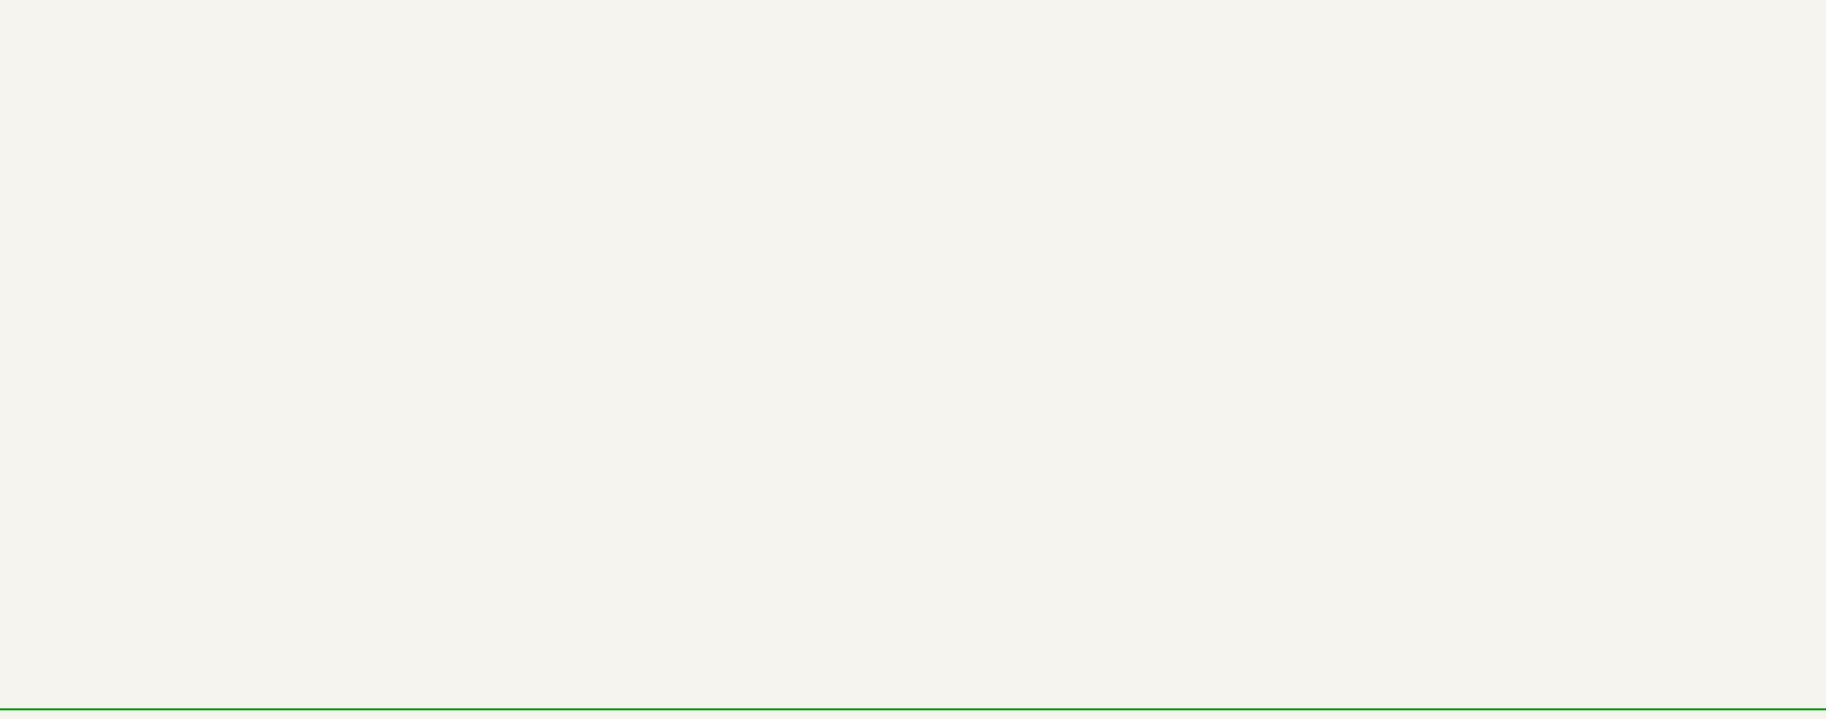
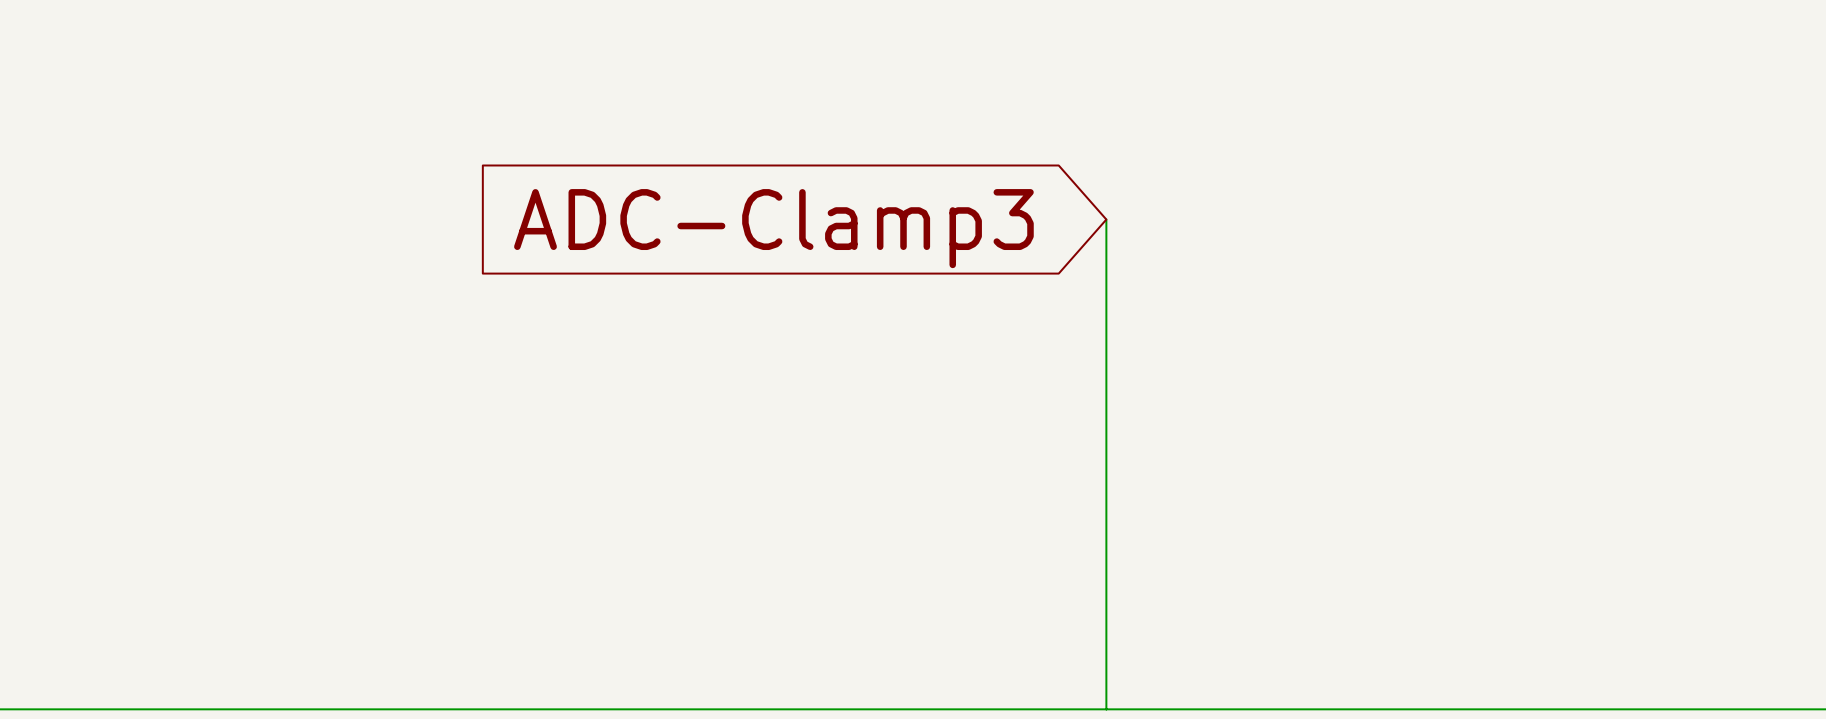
wire: none -> (1106, 219) (1106, 709)
global label: none -> ADC-Clamp3 (773, 228)

